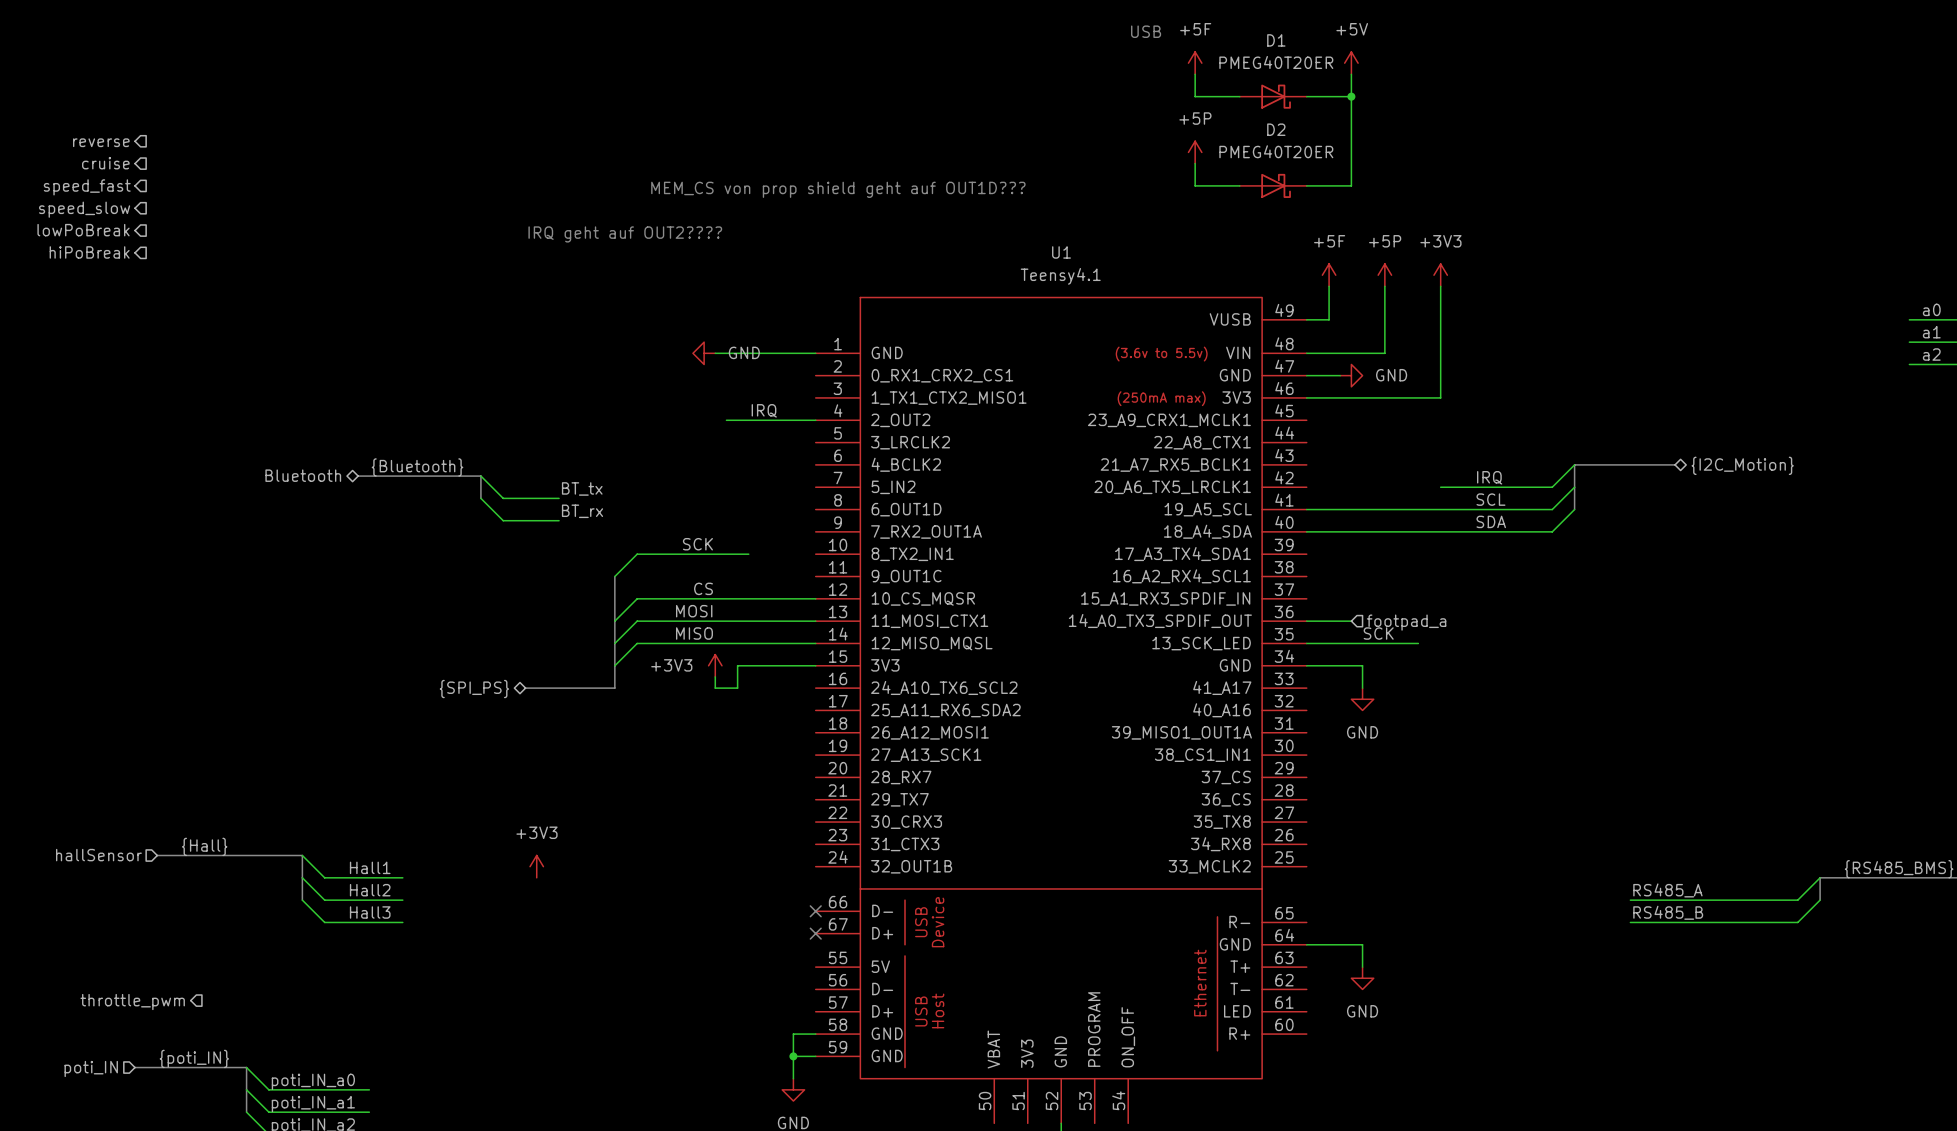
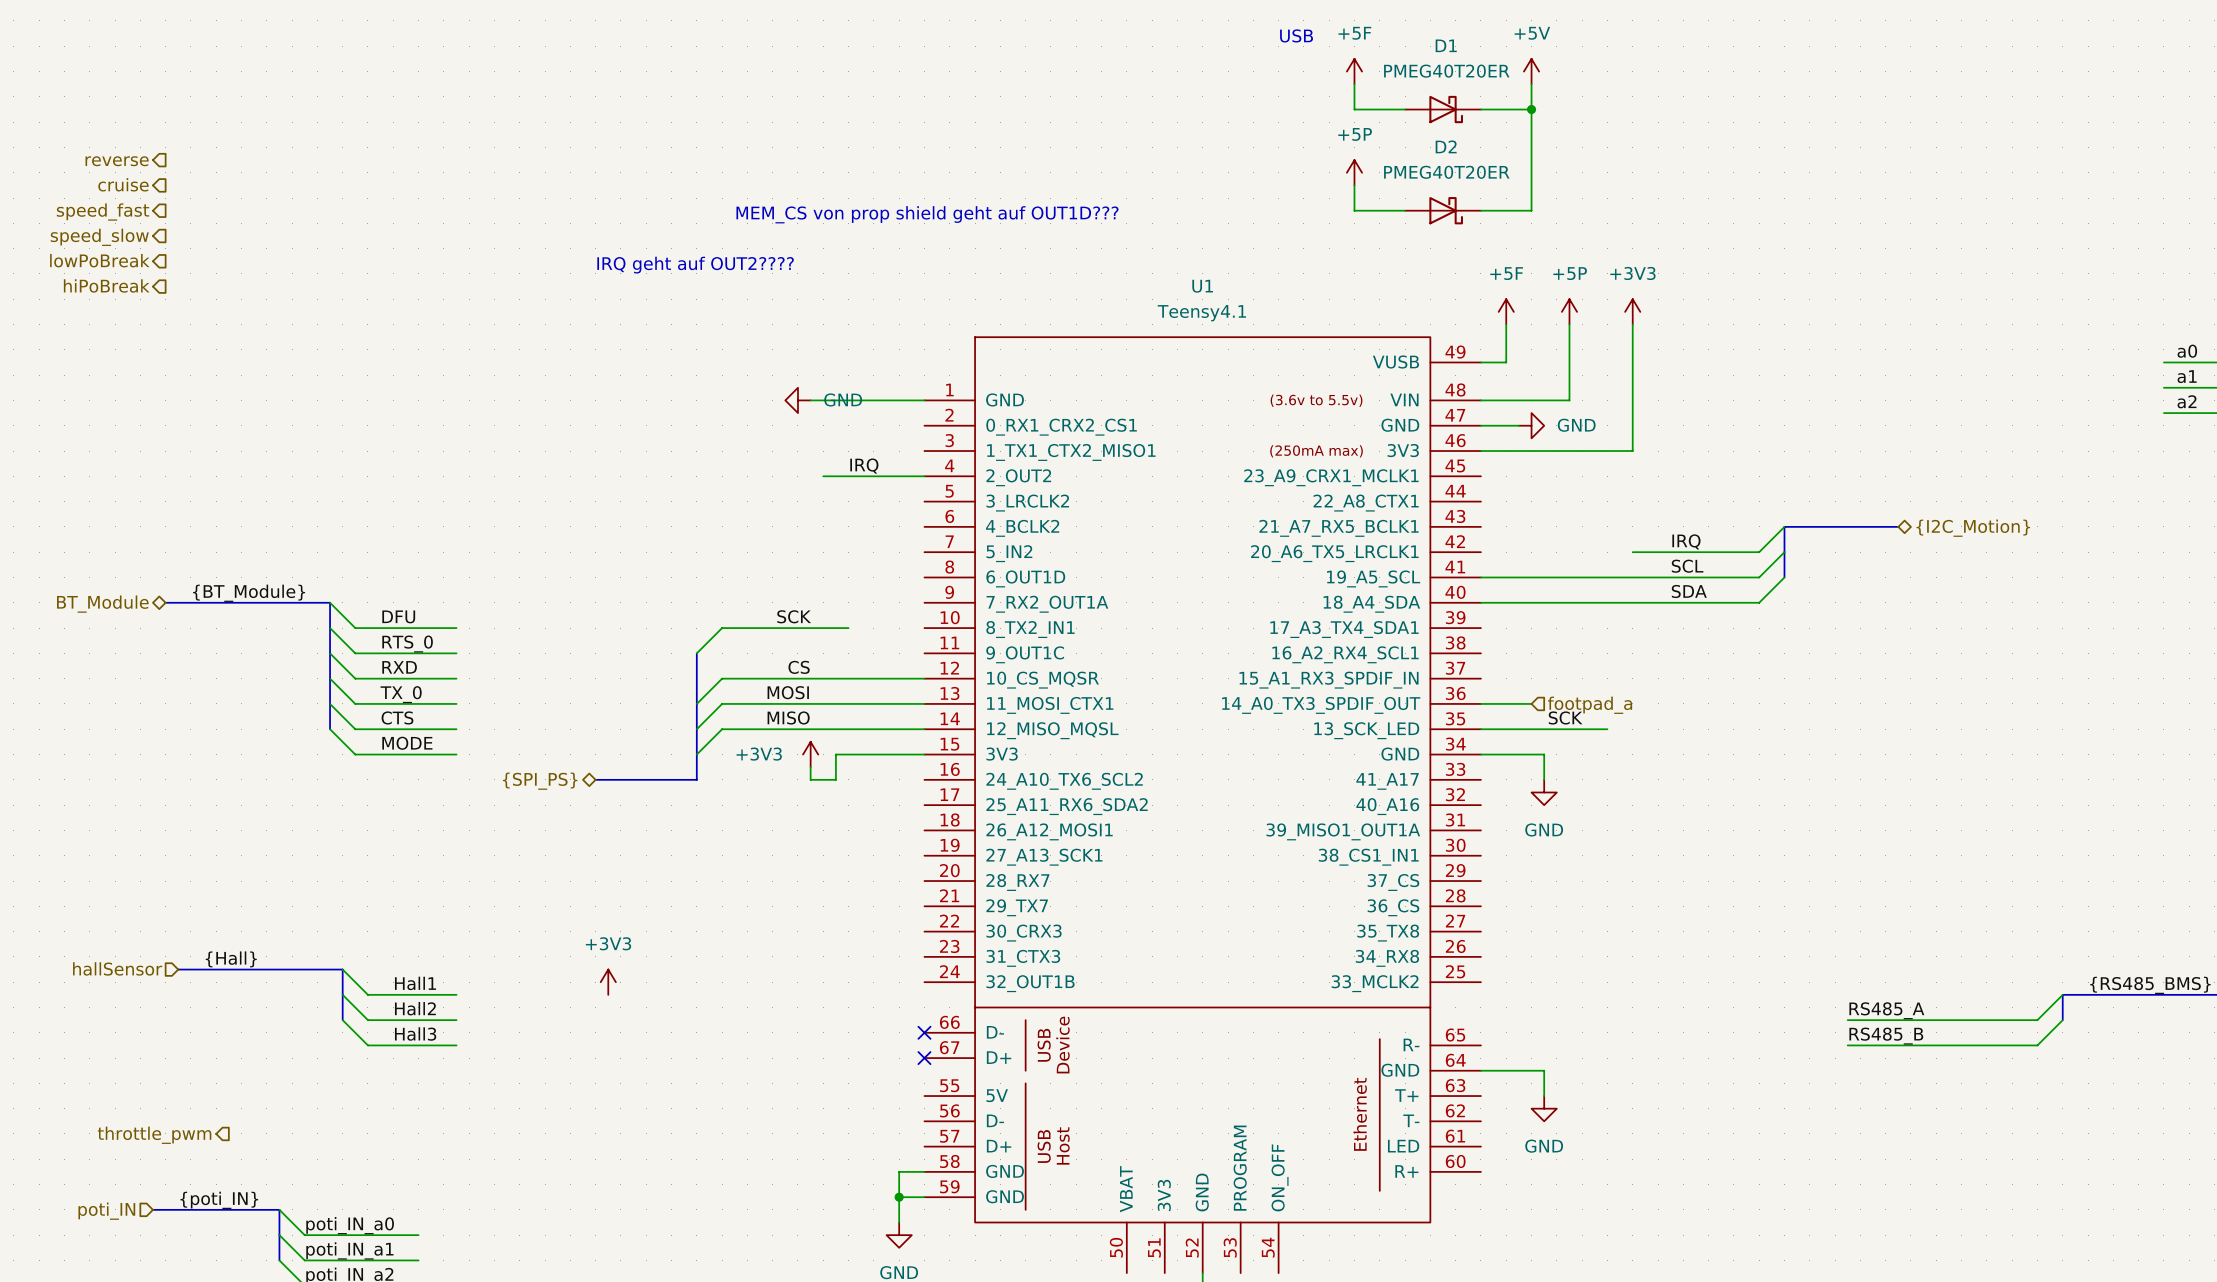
label: {Bluetooth} (417, 467) -> none
hierarchical label: Bluetooth (303, 475) -> none
bus: (358, 476) (480, 476) (480, 498) -> none
wire: (480, 476) (503, 498) (559, 498) -> none
label: BT_tx (582, 488) -> none
wire: (480, 498) (503, 520) (559, 520) -> none
label: BT_rx (582, 511) -> none
label: none -> {BT_Module} (249, 593)
hierarchical label: none -> BT_Module (102, 604)
bus: none -> (165, 602) (330, 602) (330, 729)
wire: none -> (330, 602) (355, 628) (456, 628)
label: none -> DFU (398, 616)
wire: none -> (330, 628) (355, 653) (456, 653)
label: none -> RTS_0 (407, 644)
wire: none -> (330, 653) (355, 678) (456, 678)
label: none -> RXD (399, 667)
wire: none -> (330, 678) (355, 703) (456, 703)
label: none -> TX_0 (401, 694)
wire: none -> (330, 703) (355, 729) (456, 729)
label: none -> CTS (397, 717)
wire: none -> (330, 729) (355, 754) (456, 754)
label: none -> MODE (407, 743)

